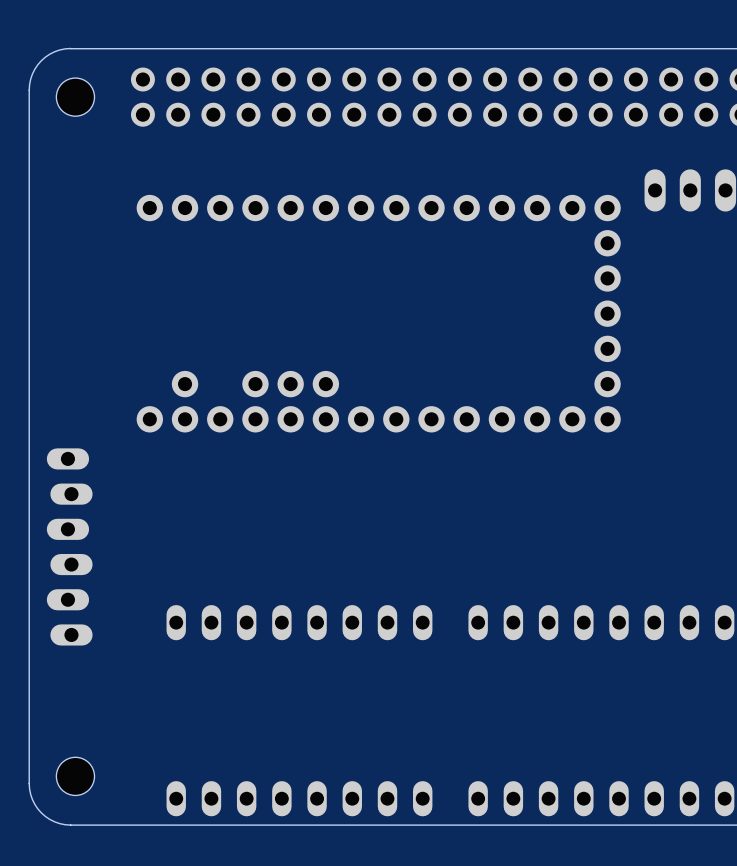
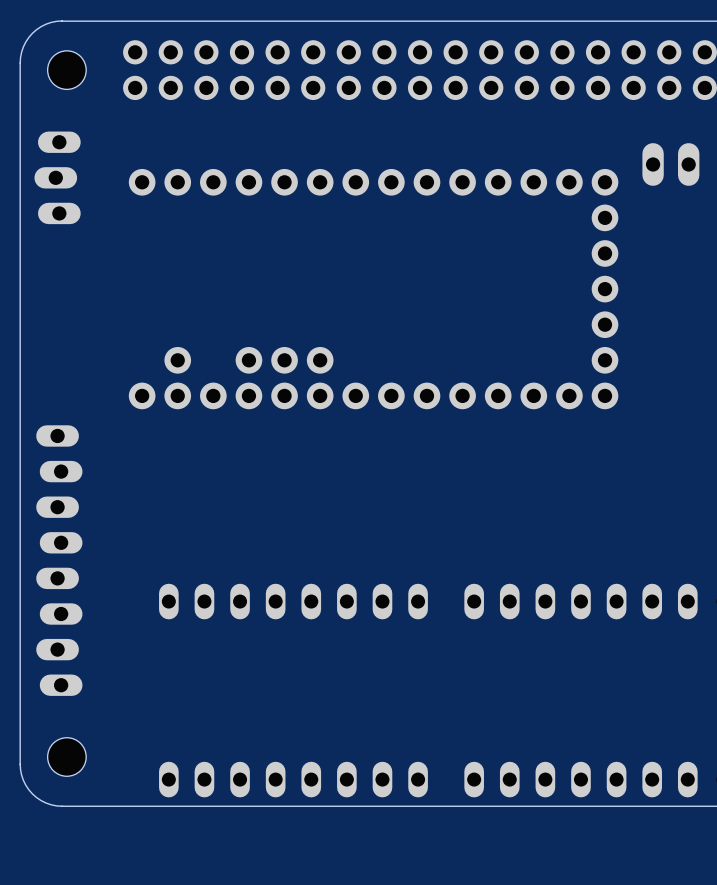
part: none -> (57, 177)
part: (69, 546) -> none
part: none -> (59, 560)

